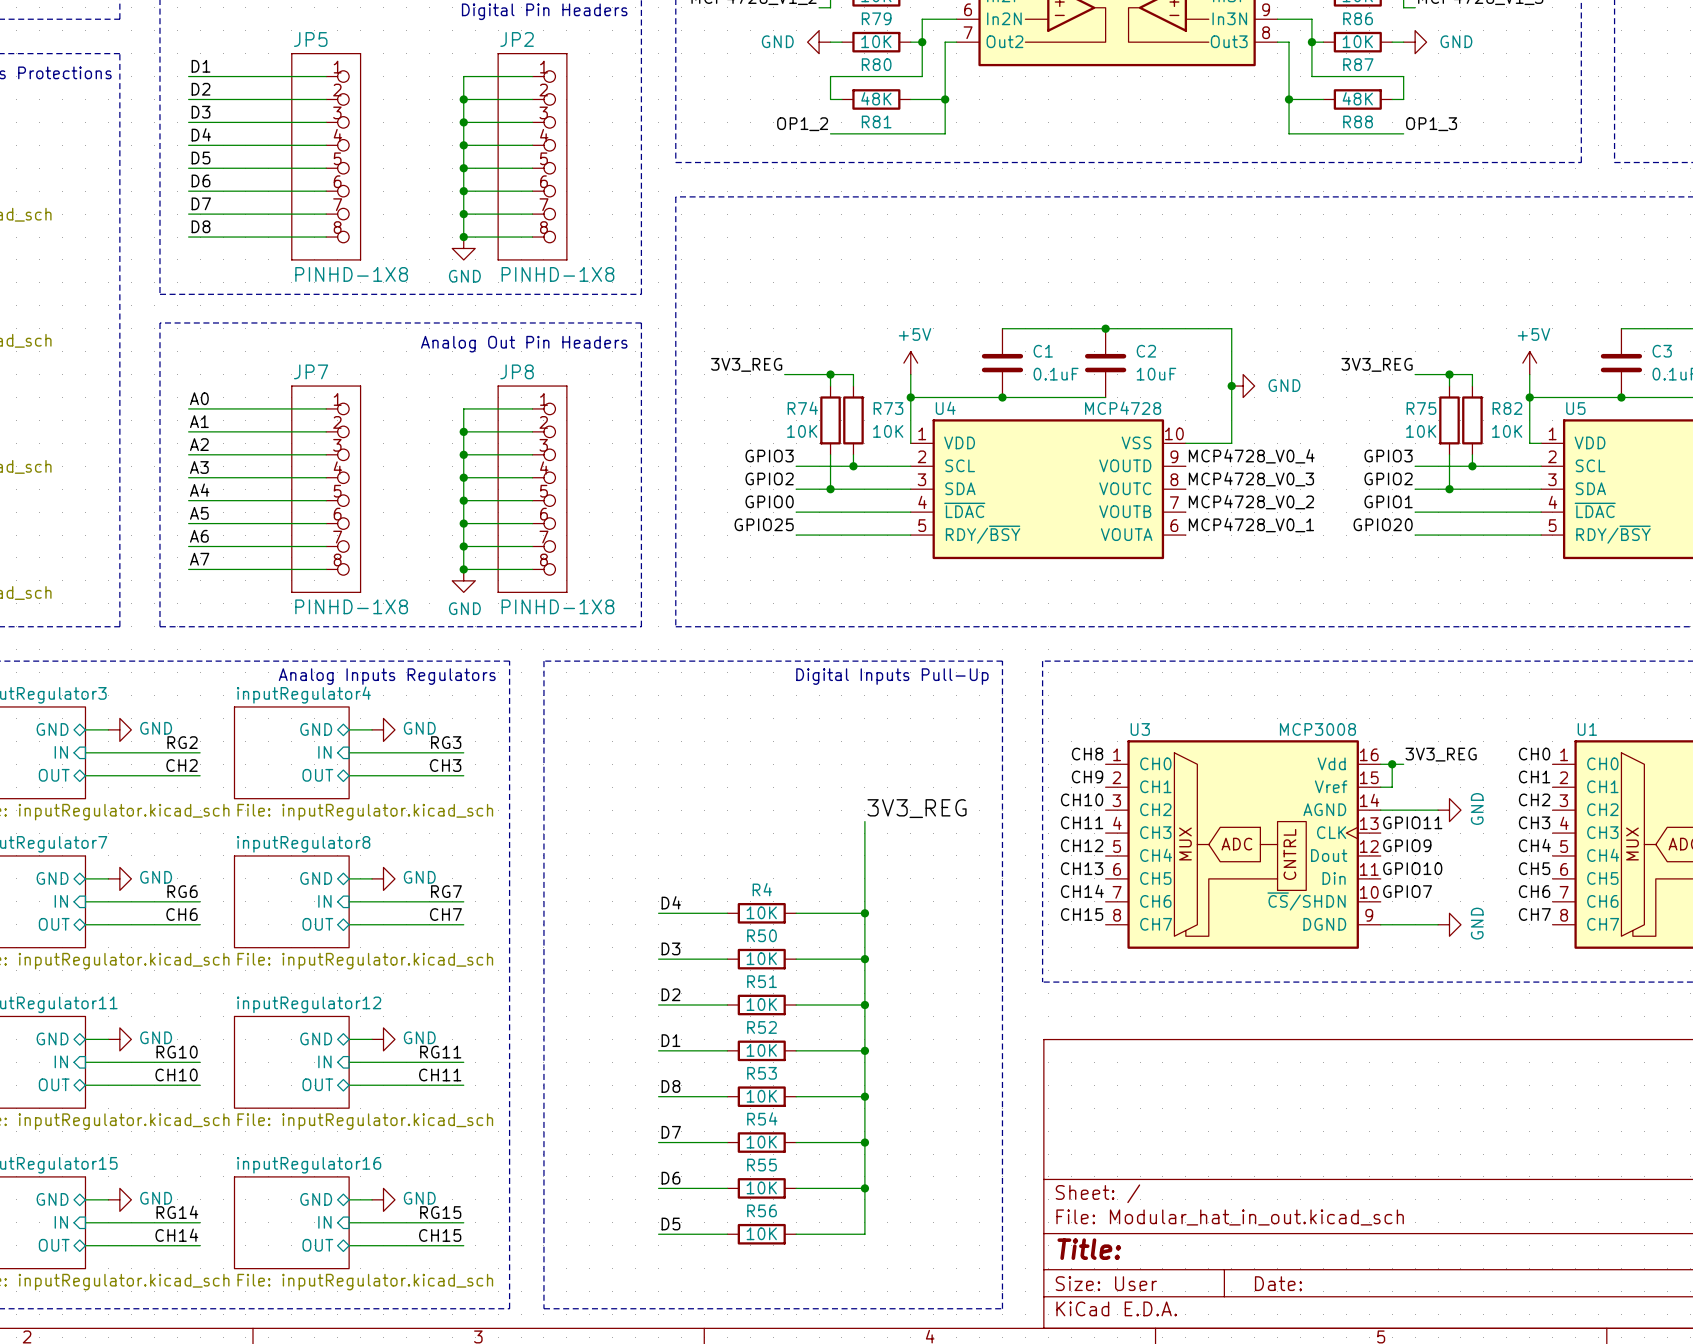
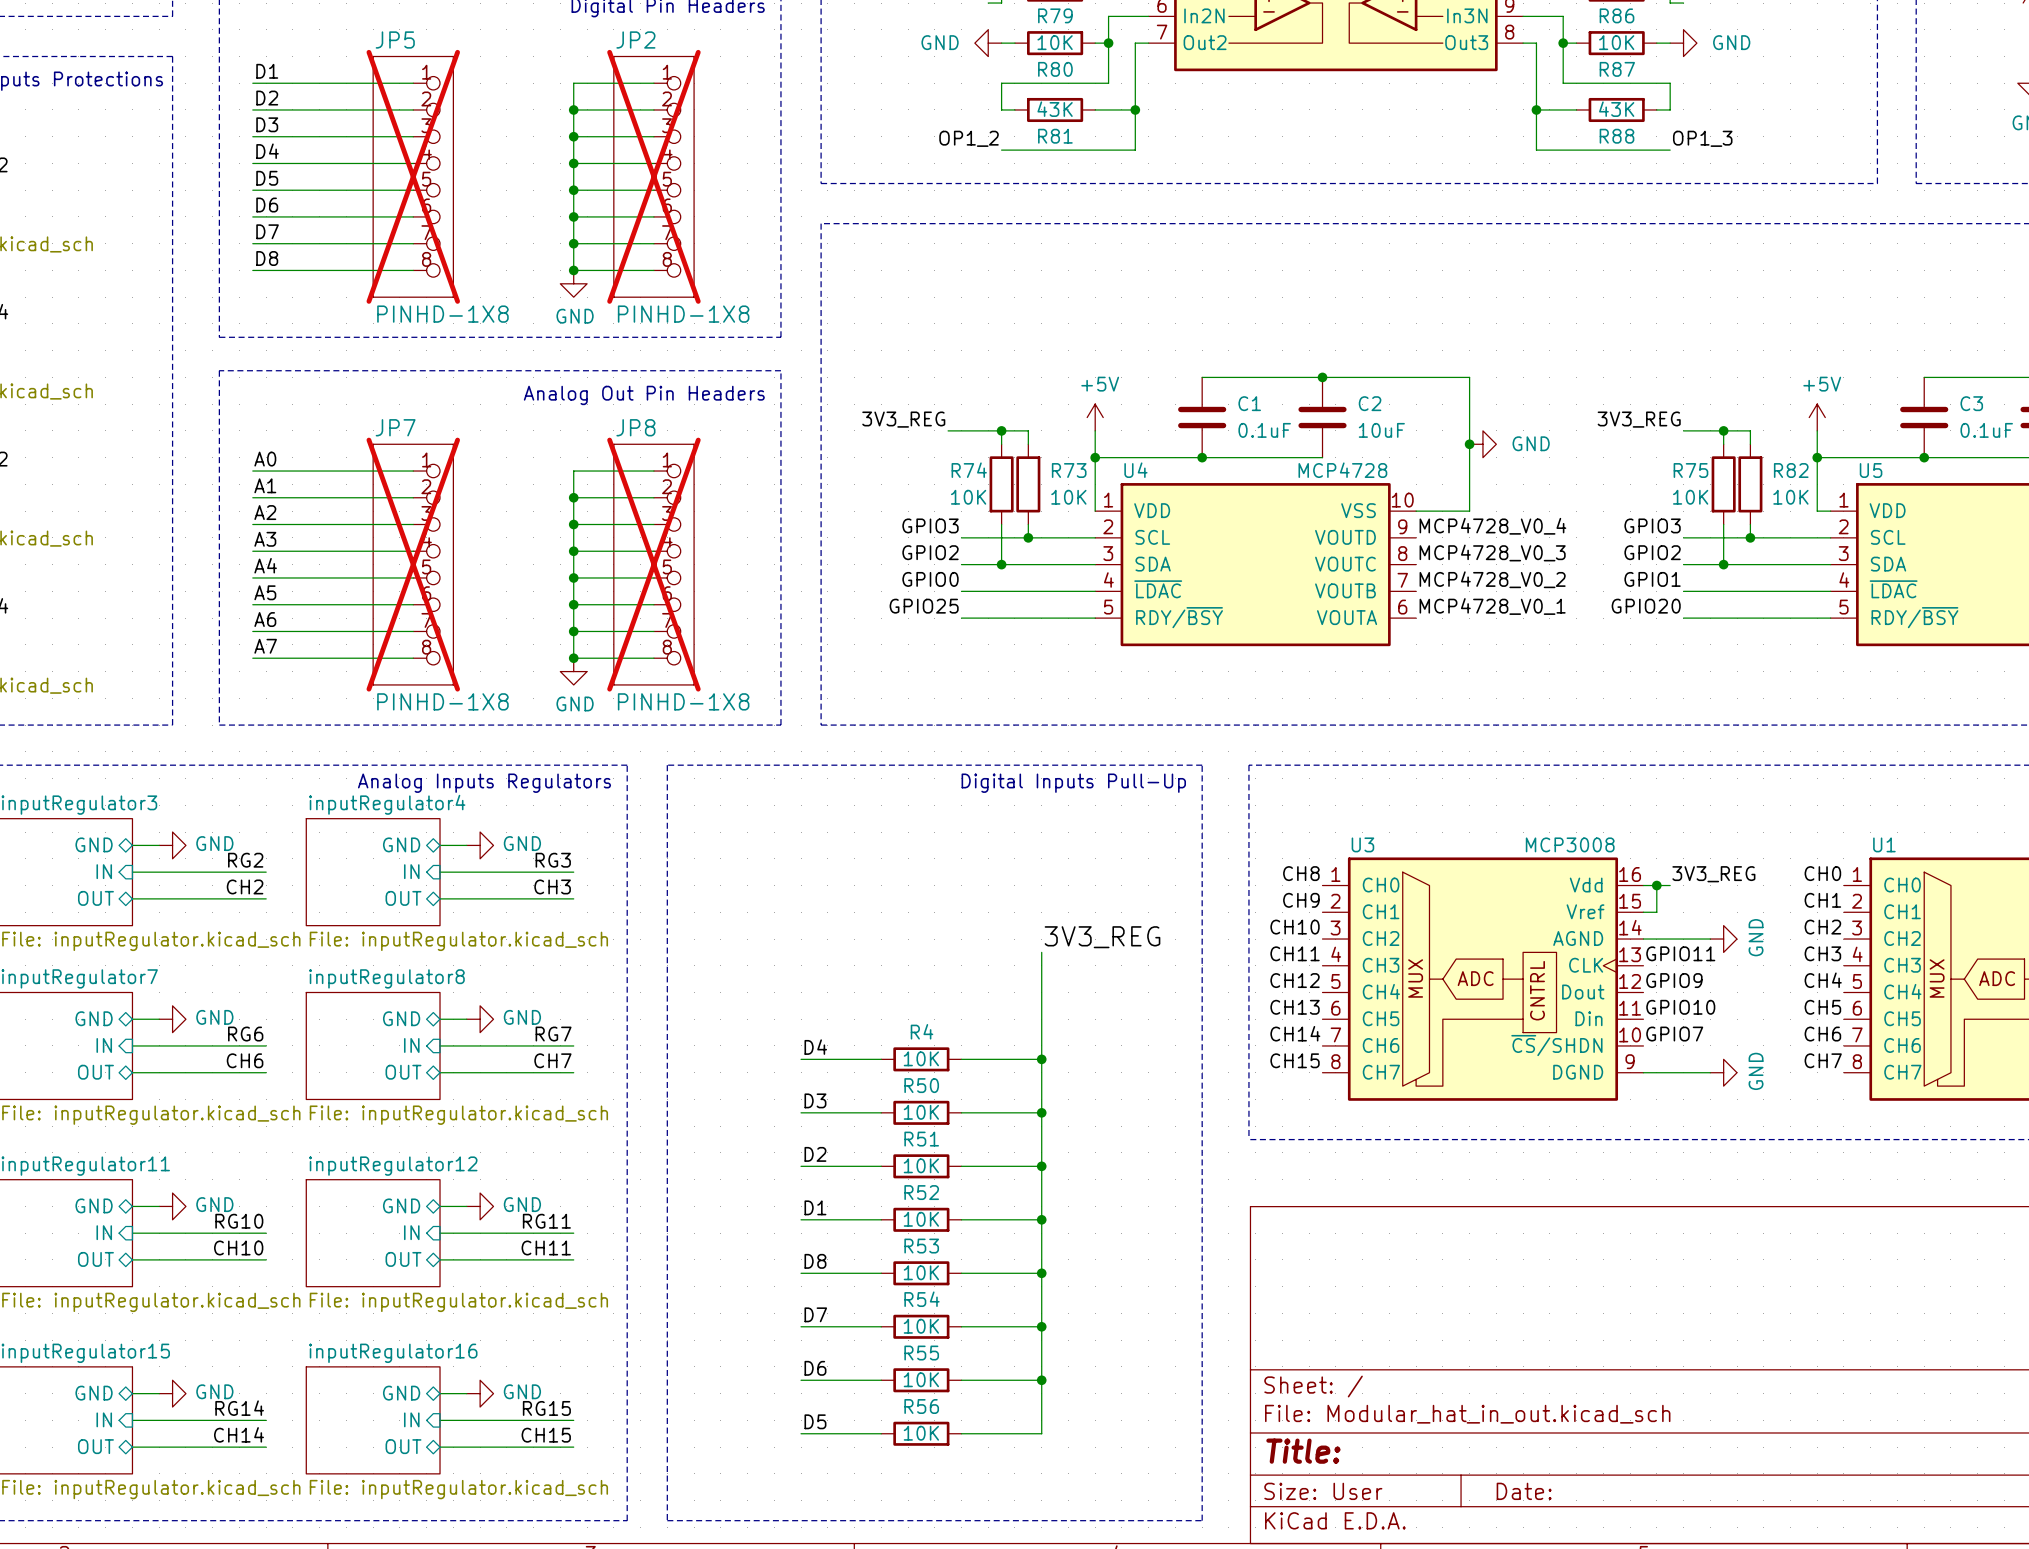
R81 value: 48K (876, 98) -> 43K (1055, 109)
R88 value: 48K (1357, 98) -> 43K (1616, 109)
JP5 do-not-place cross: none -> (413, 176)
JP2 do-not-place cross: none -> (653, 176)
JP7 do-not-place cross: none -> (413, 564)
JP8 do-not-place cross: none -> (653, 564)

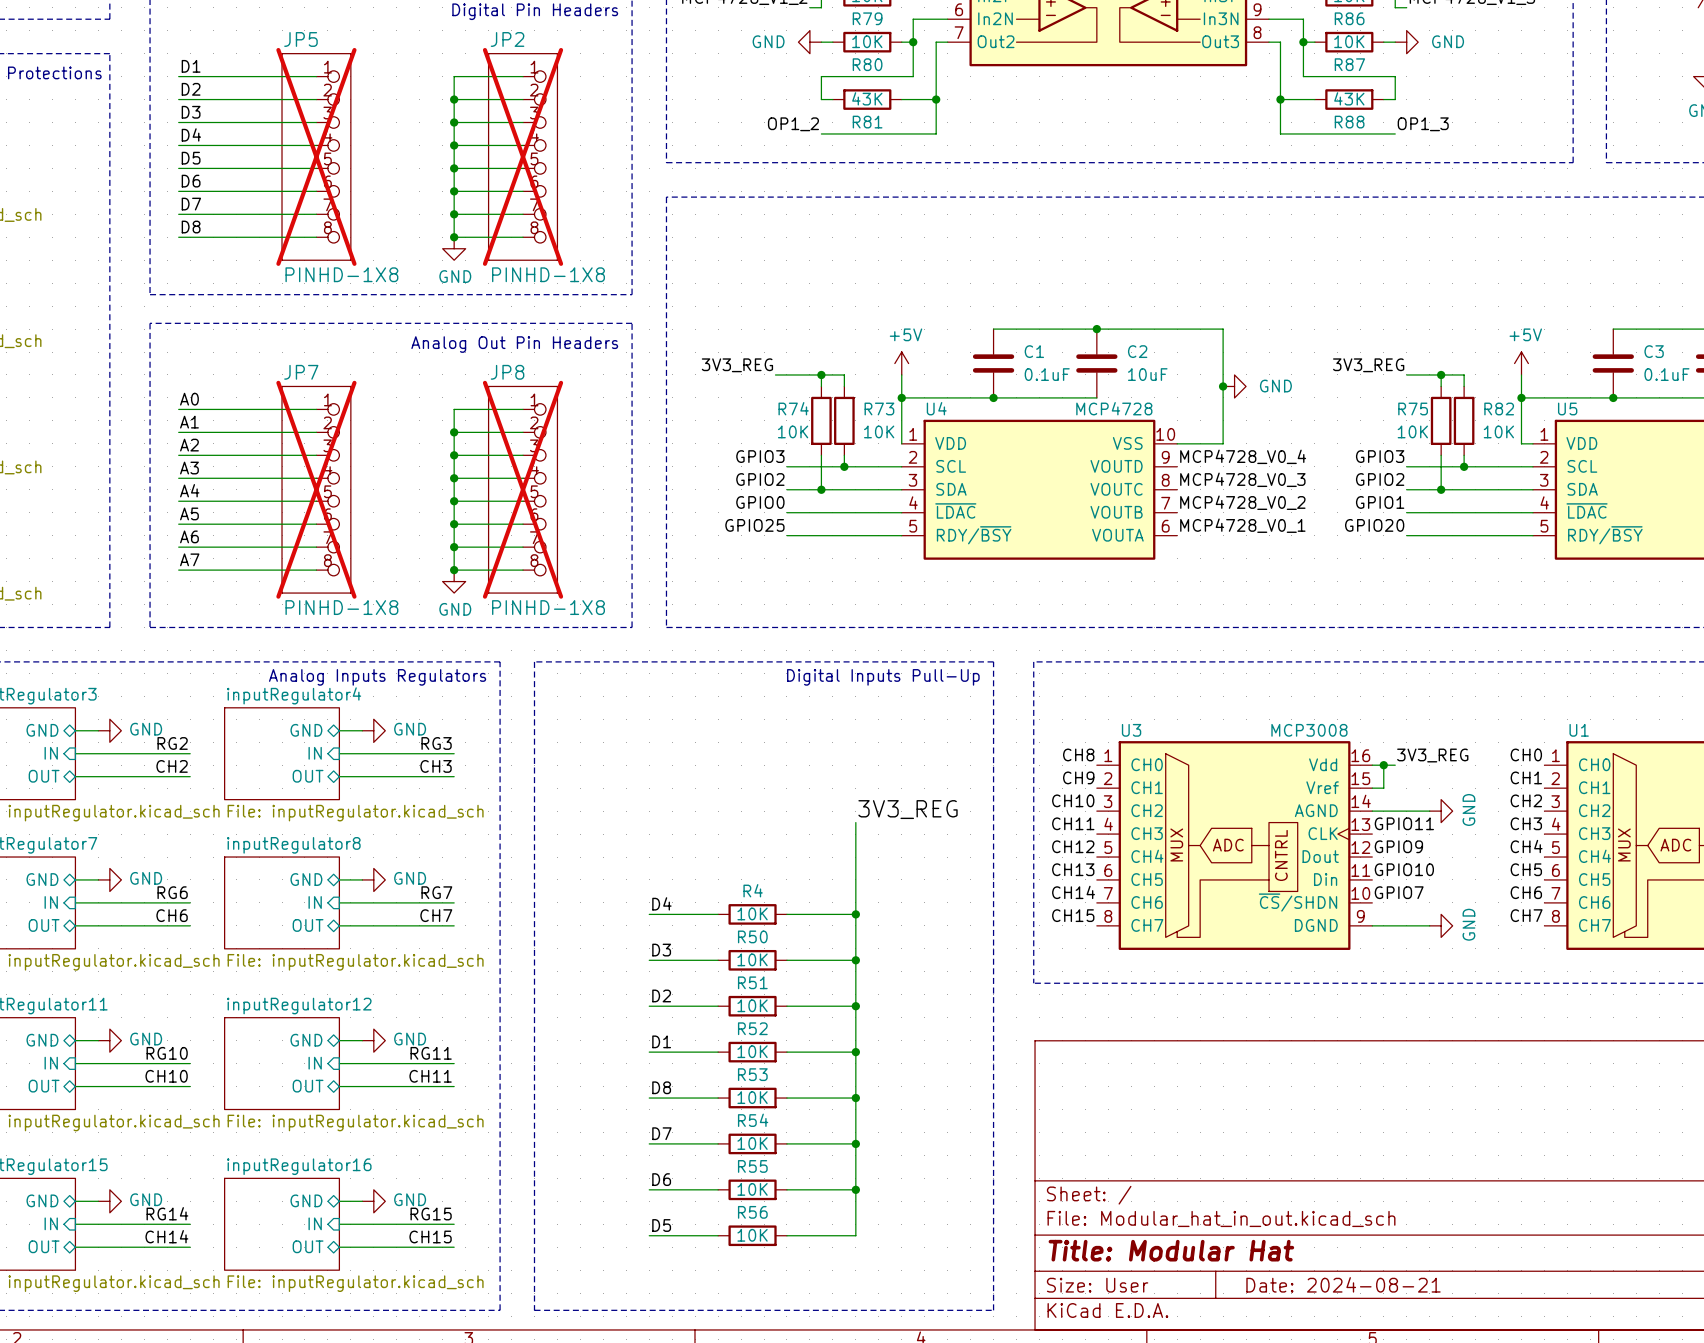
title block: Title: (1303, 1451) -> Title: Modular Hat (1171, 1250)
title block: Date: (1524, 1491) -> Date: 2024-08-21 (1343, 1284)

